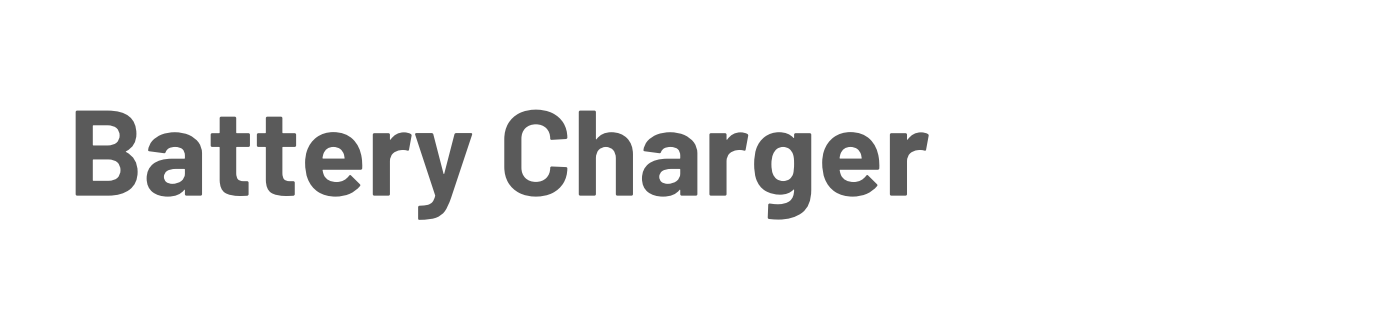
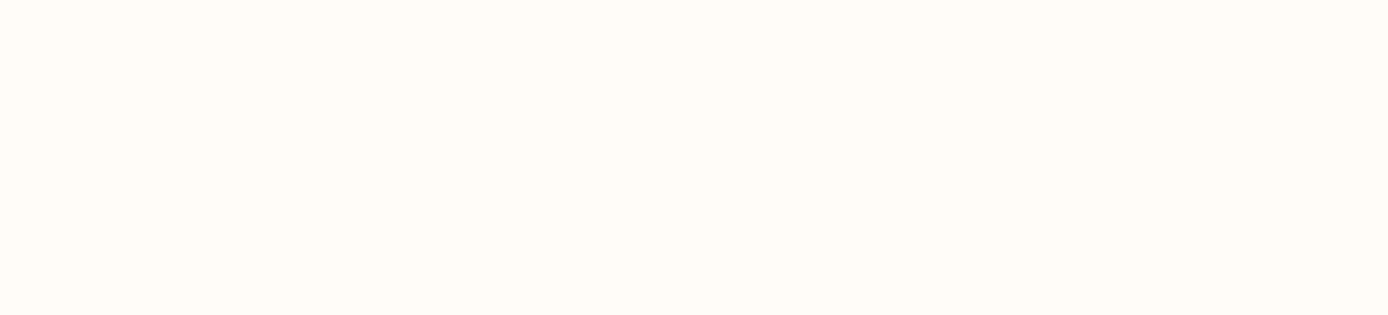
text: Battery Charger (502, 164) -> none

